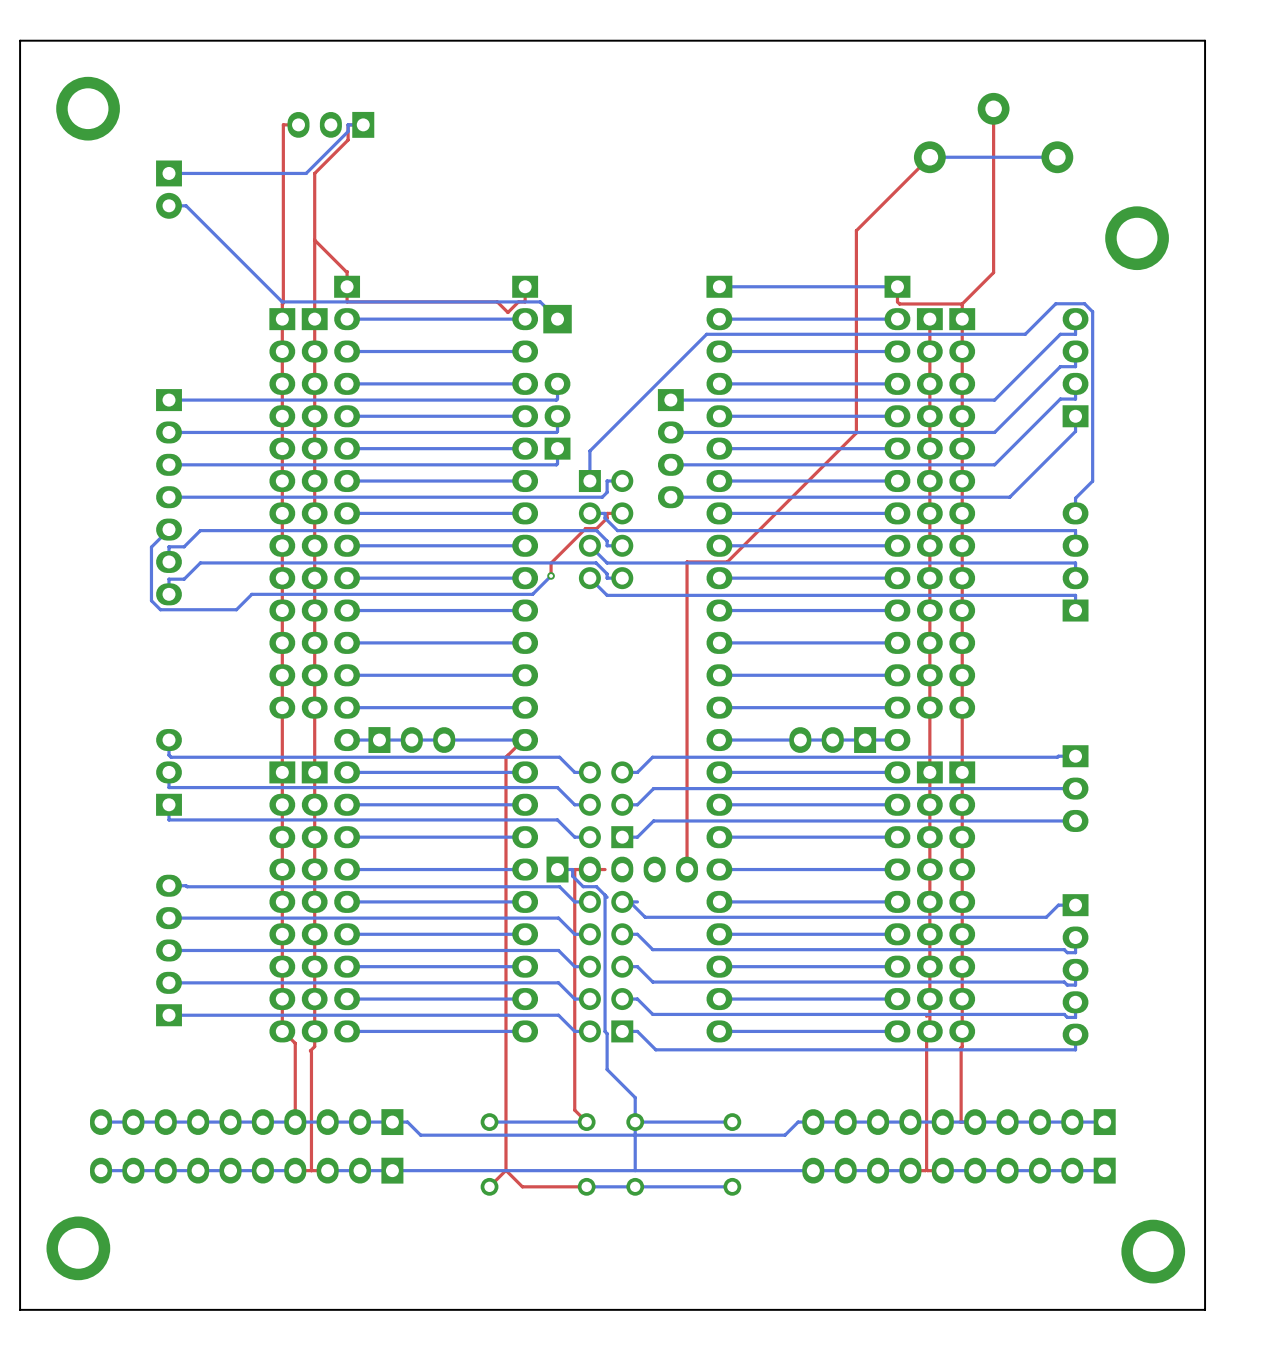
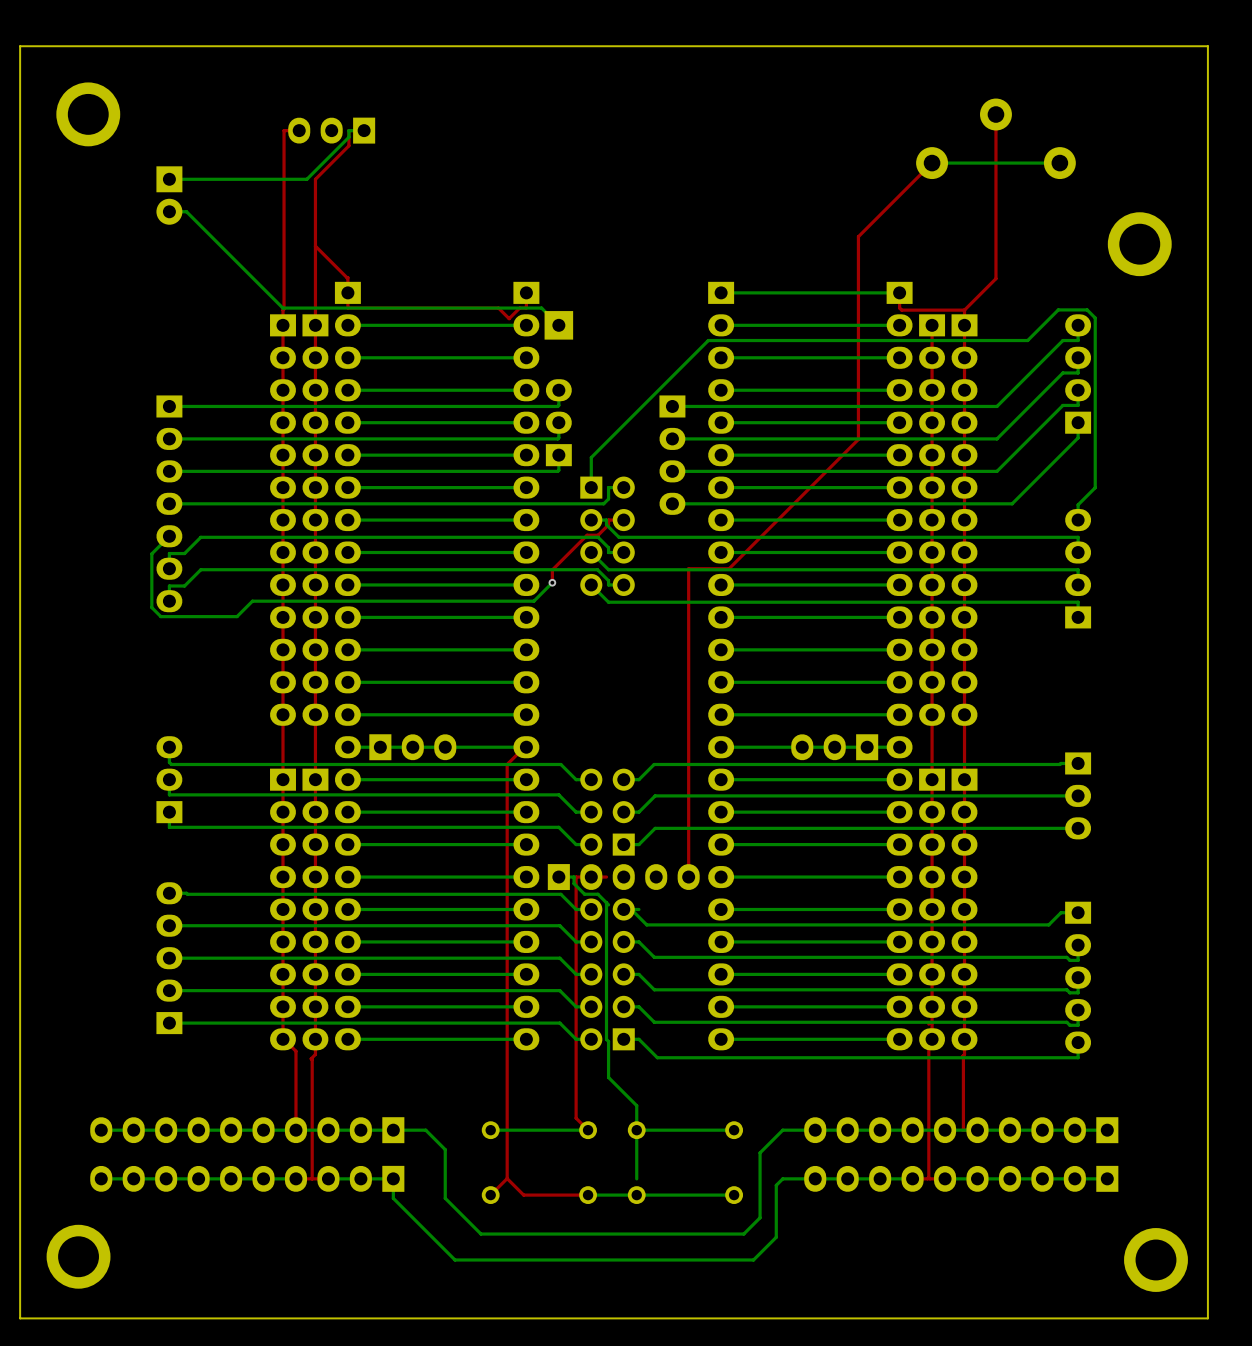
bottom track: (798, 1122) (785, 1135) (420, 1135) (407, 1122) -> (800, 1130) (782, 1130) (760, 1152) (760, 1217) (743, 1234) (480, 1234) (445, 1198) (445, 1149) (425, 1130) (408, 1130)
bottom track: (780, 1170) (392, 1170) -> (782, 1178) (776, 1185) (776, 1237) (753, 1259) (455, 1259) (393, 1198) (393, 1178)

